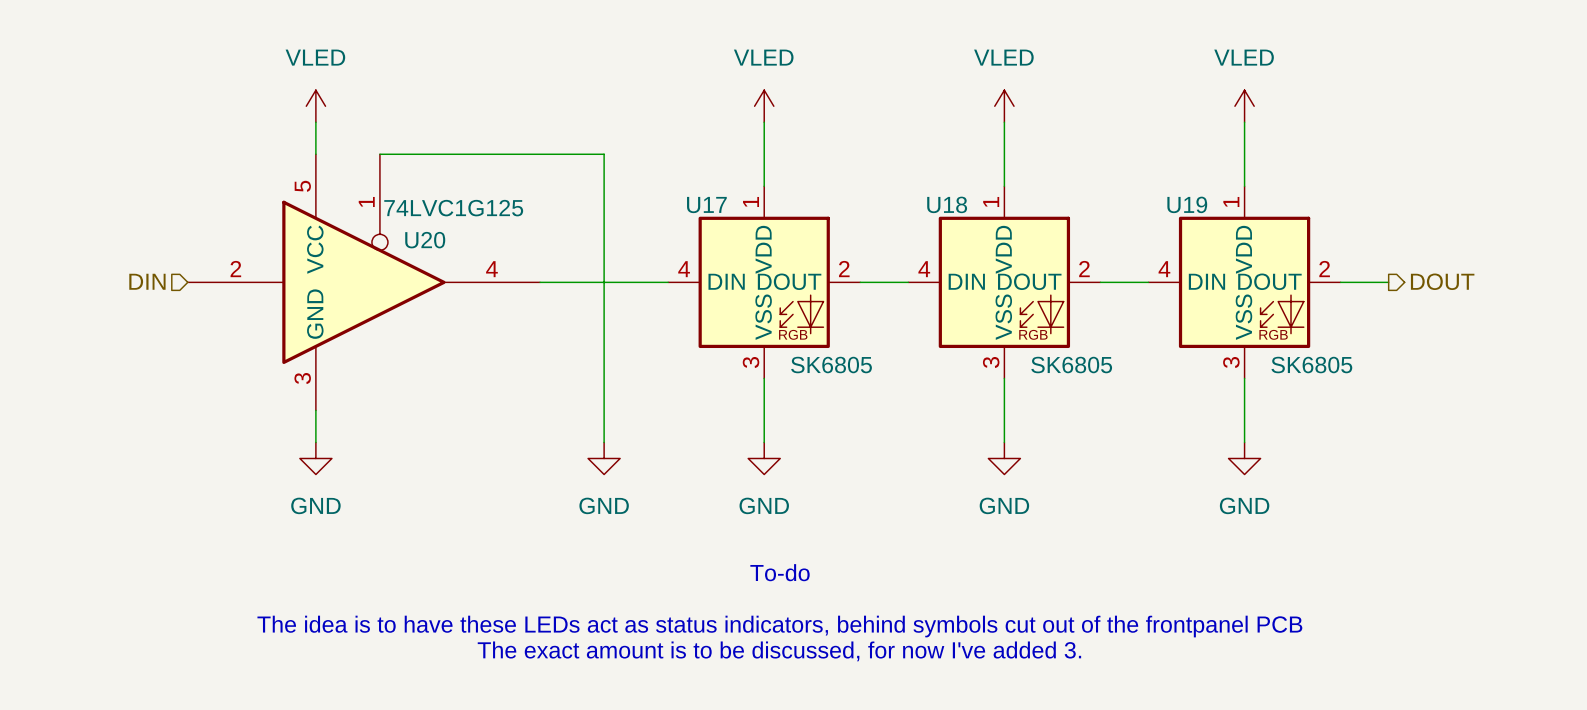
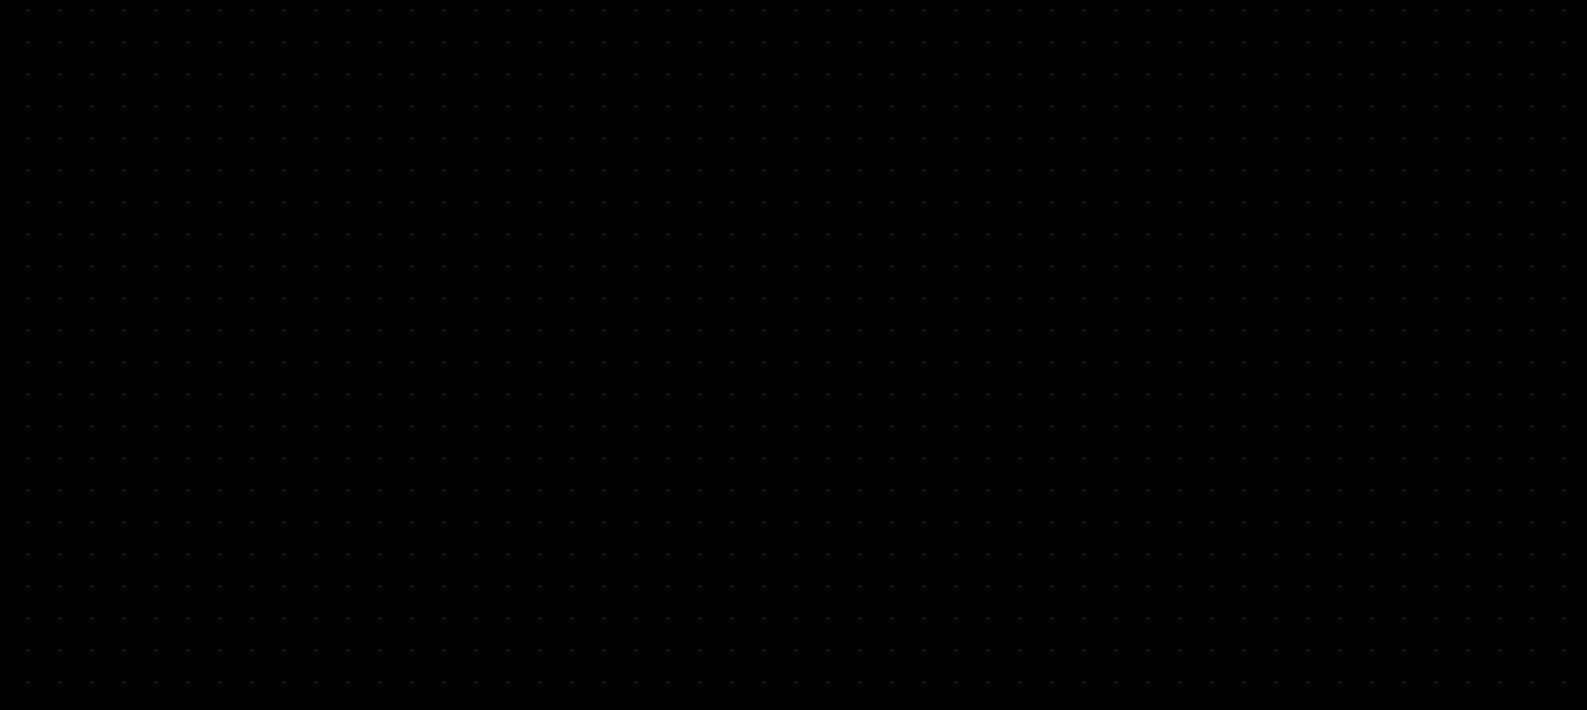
power symbol: VLED (315, 106) -> none
power symbol: VLED (764, 106) -> none
power symbol: VLED (1004, 106) -> none
power symbol: VLED (1244, 106) -> none
wire: (315, 122) (315, 154) -> none
wire: (764, 122) (764, 186) -> none
wire: (1004, 122) (1004, 186) -> none
wire: (1244, 122) (1244, 186) -> none
wire: (379, 154) (604, 154) (604, 442) -> none
hierarchical label: DIN (147, 281) -> none
hierarchical label: DOUT (1442, 281) -> none
U20: 74LVC1G125 (363, 282) -> none
wire: (540, 282) (668, 282) -> none
U17: SK6805 (764, 282) -> none
wire: (860, 282) (908, 282) -> none
U18: SK6805 (1004, 282) -> none
wire: (1100, 282) (1148, 282) -> none
U19: SK6805 (1244, 282) -> none
wire: (1340, 282) (1388, 282) -> none
wire: (764, 378) (764, 442) -> none
wire: (1004, 378) (1004, 442) -> none
wire: (1244, 378) (1244, 442) -> none
wire: (315, 410) (315, 442) -> none
power symbol: GND (315, 458) -> none
power symbol: GND (604, 458) -> none
power symbol: GND (764, 458) -> none
power symbol: GND (1004, 458) -> none
power symbol: GND (1244, 458) -> none
text: To-do (780, 572) -> none
text: The idea is to have these LEDs act as status indicators, behind symbols cut out of the frontpanel PCB (779, 626) -> none
text: The exact amount is to be discussed, for now I've added 3. (779, 651) -> none

